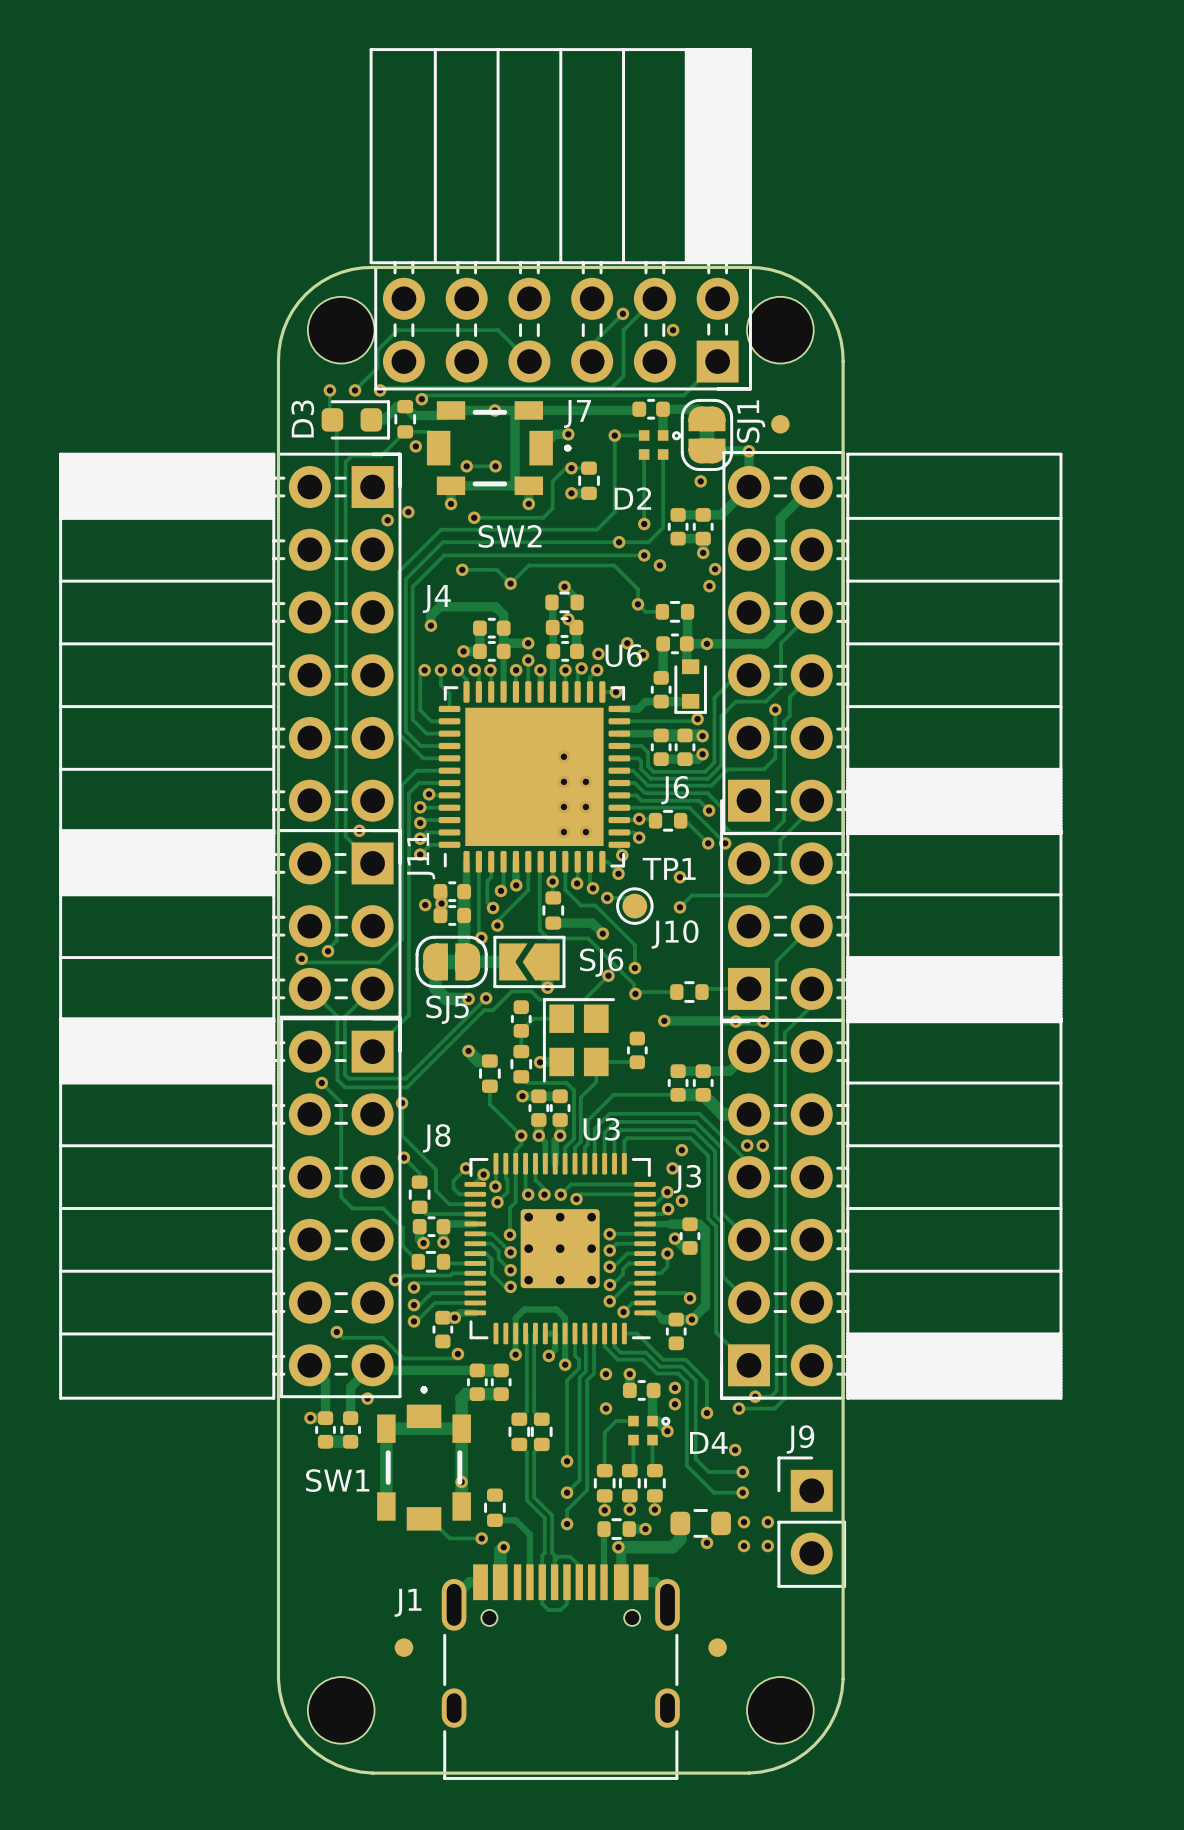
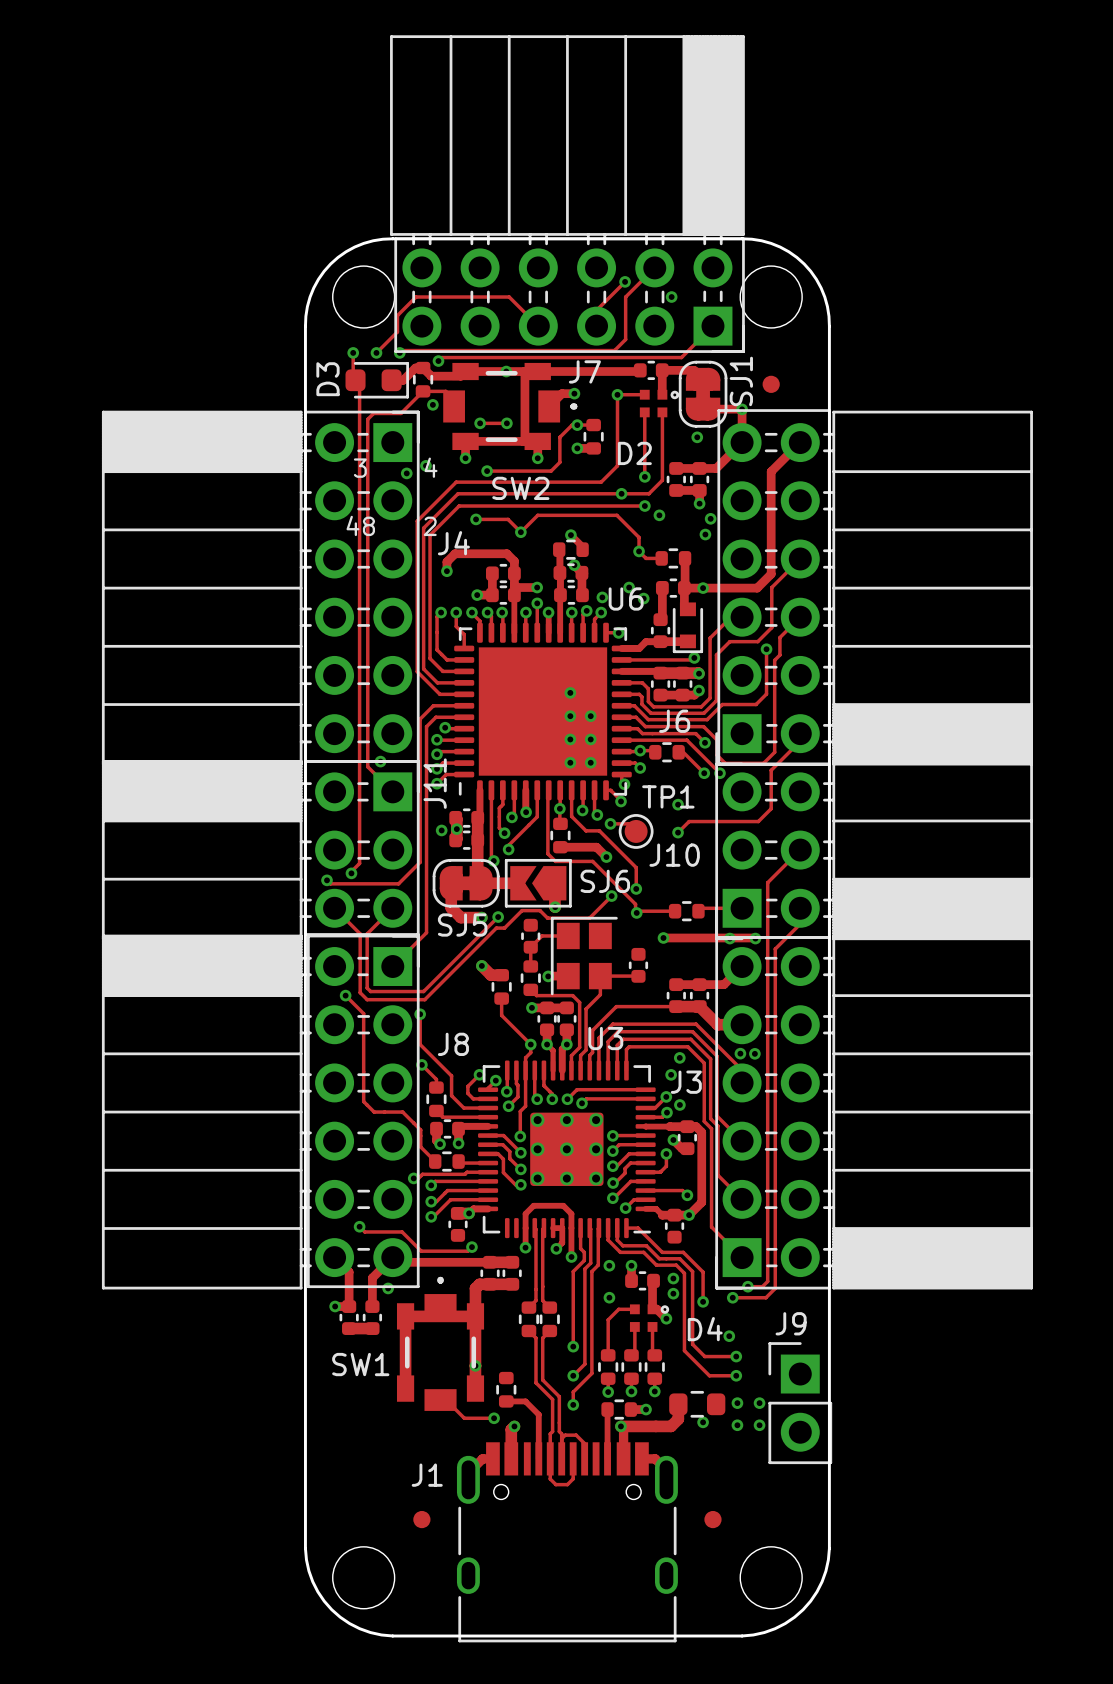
text: none -> 3 (360, 468)
text: none -> 4 (431, 467)
text: none -> 48 (360, 525)
text: none -> 2 (430, 526)

